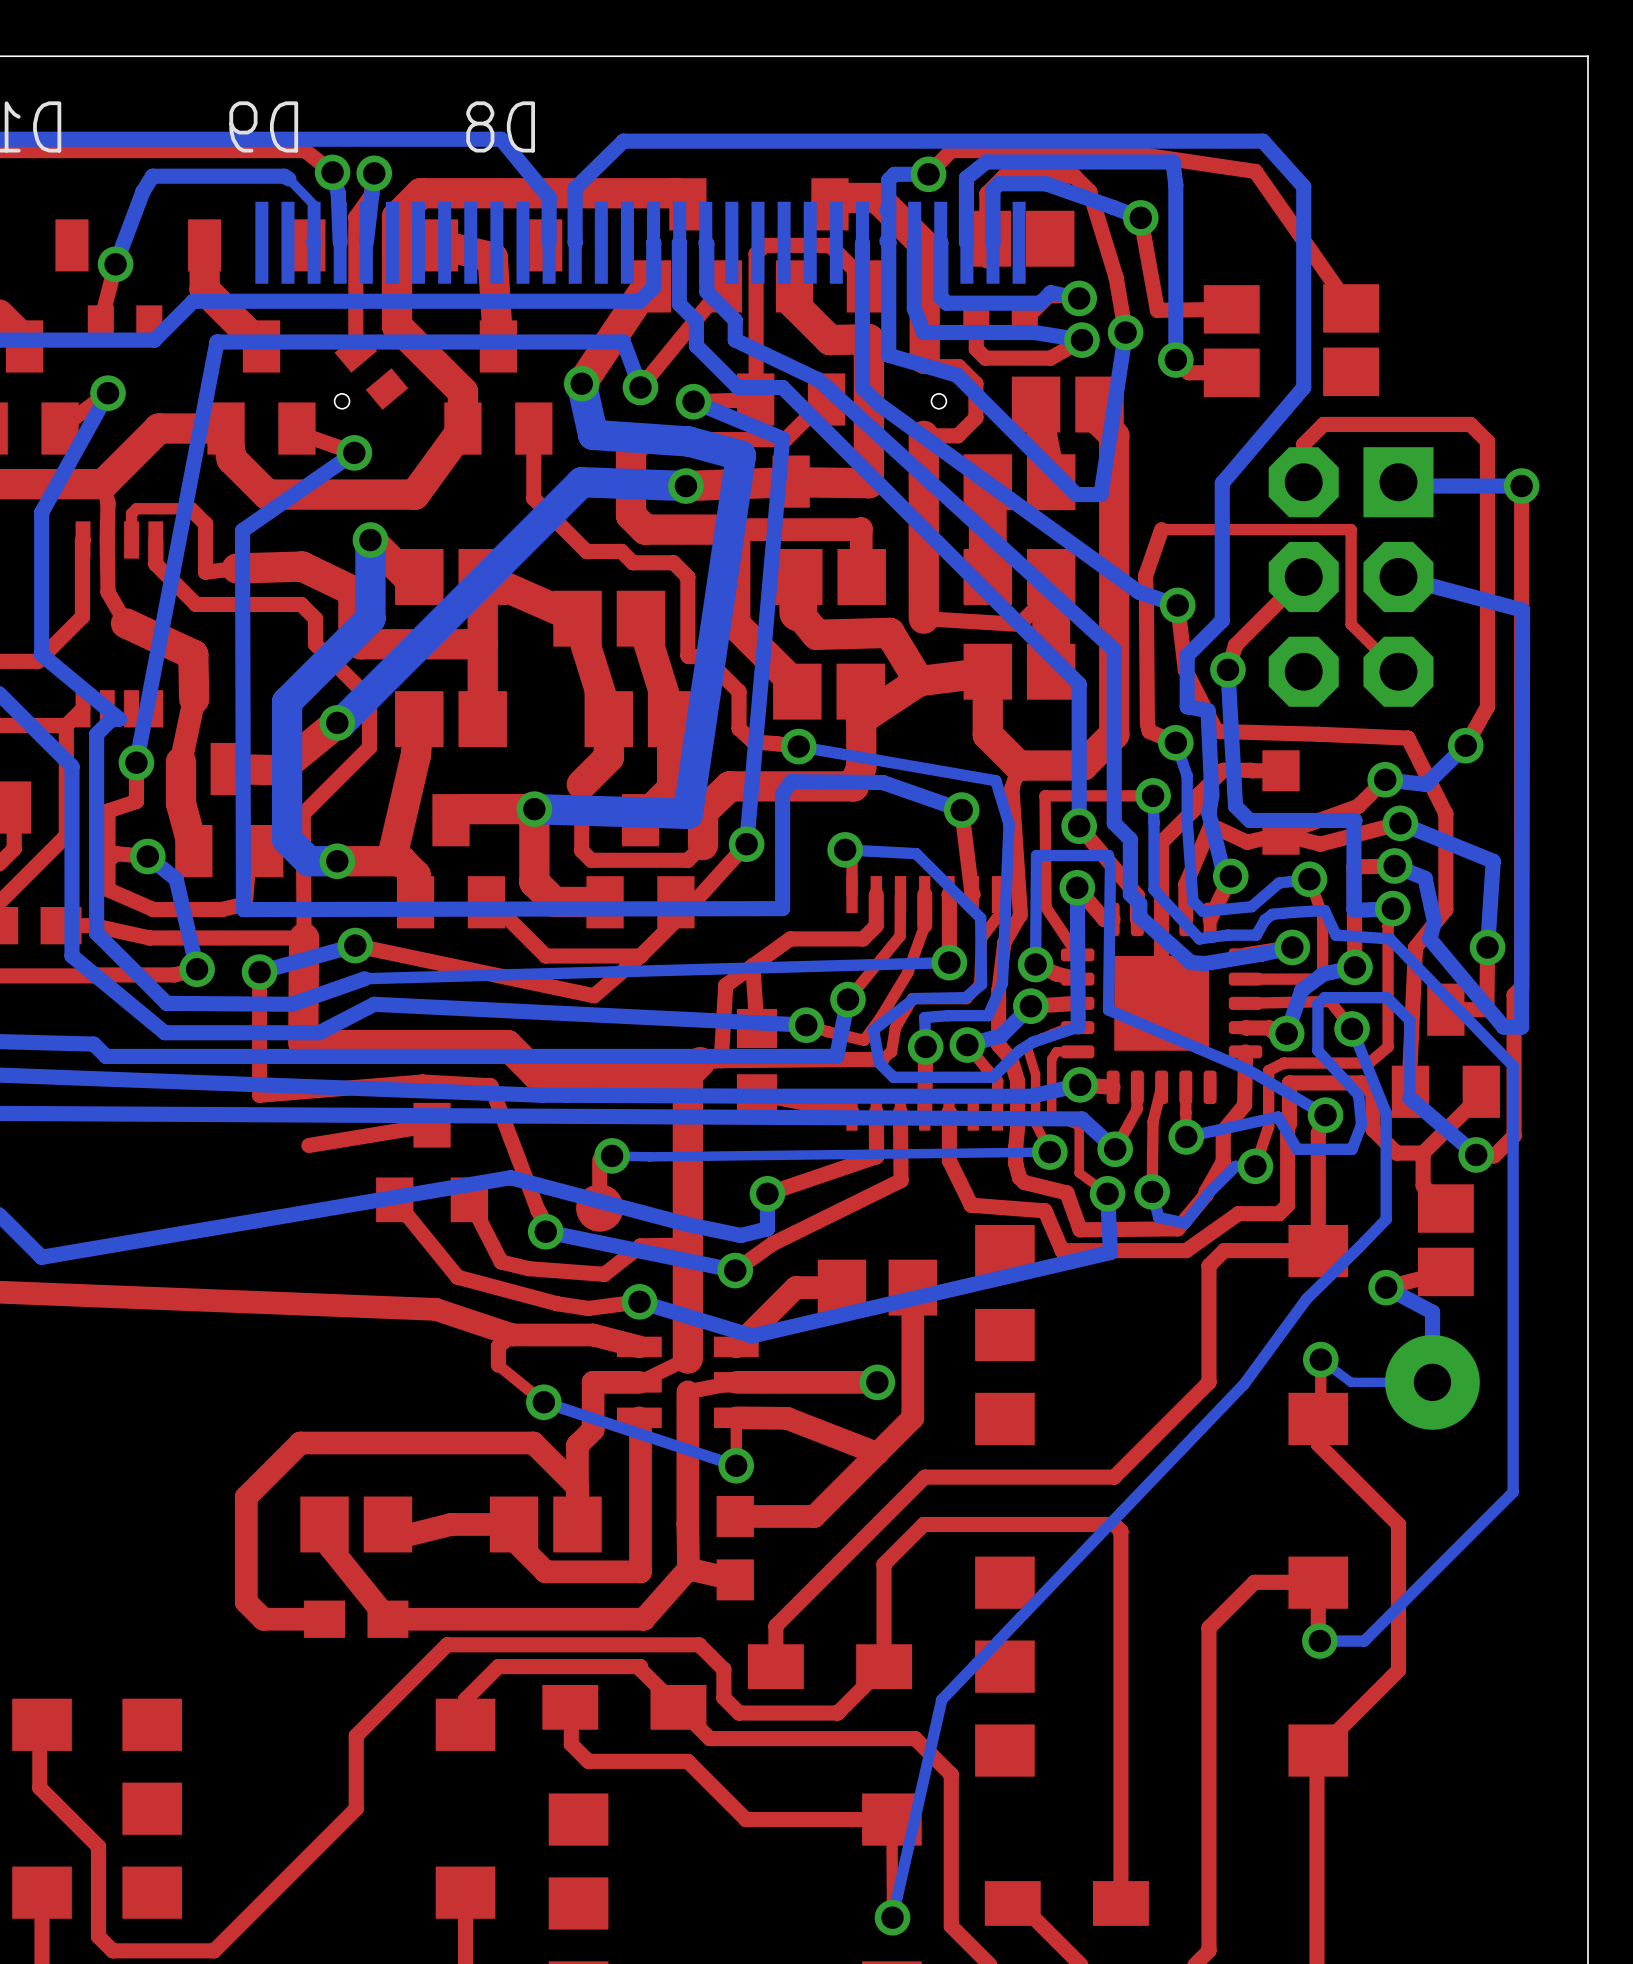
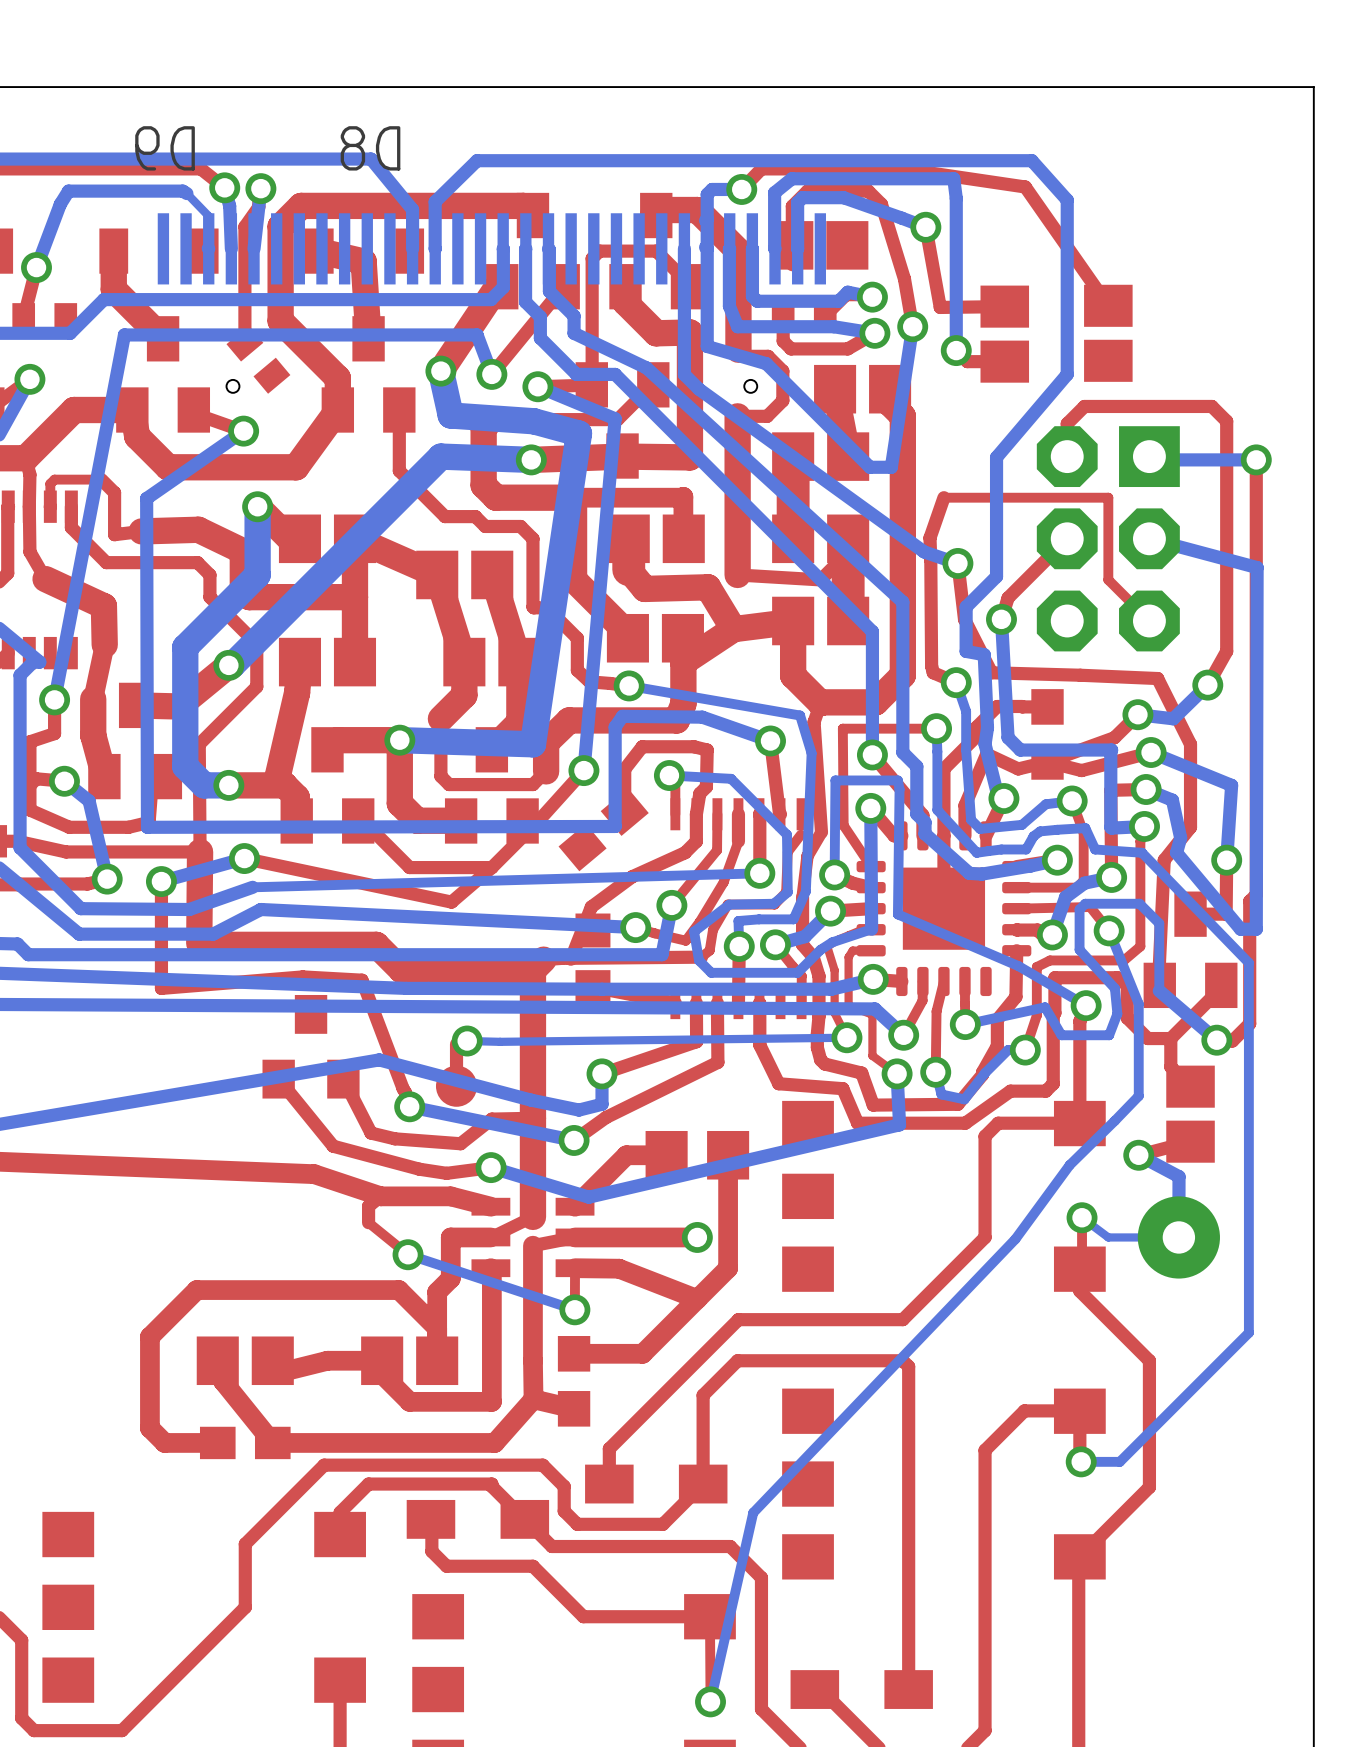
top track: none -> (624, 812) (624, 769) (642, 746) (694, 746) (707, 750) (706, 787) (699, 793) (696, 814)
part: none -> (603, 829)
top track: (863, 938) (790, 938) (725, 985) (721, 1060) -> (685, 852) (632, 876) (591, 907) (570, 959)
top track: (752, 965) (757, 1028) -> none
top track: (432, 1125) (308, 1145) -> none

